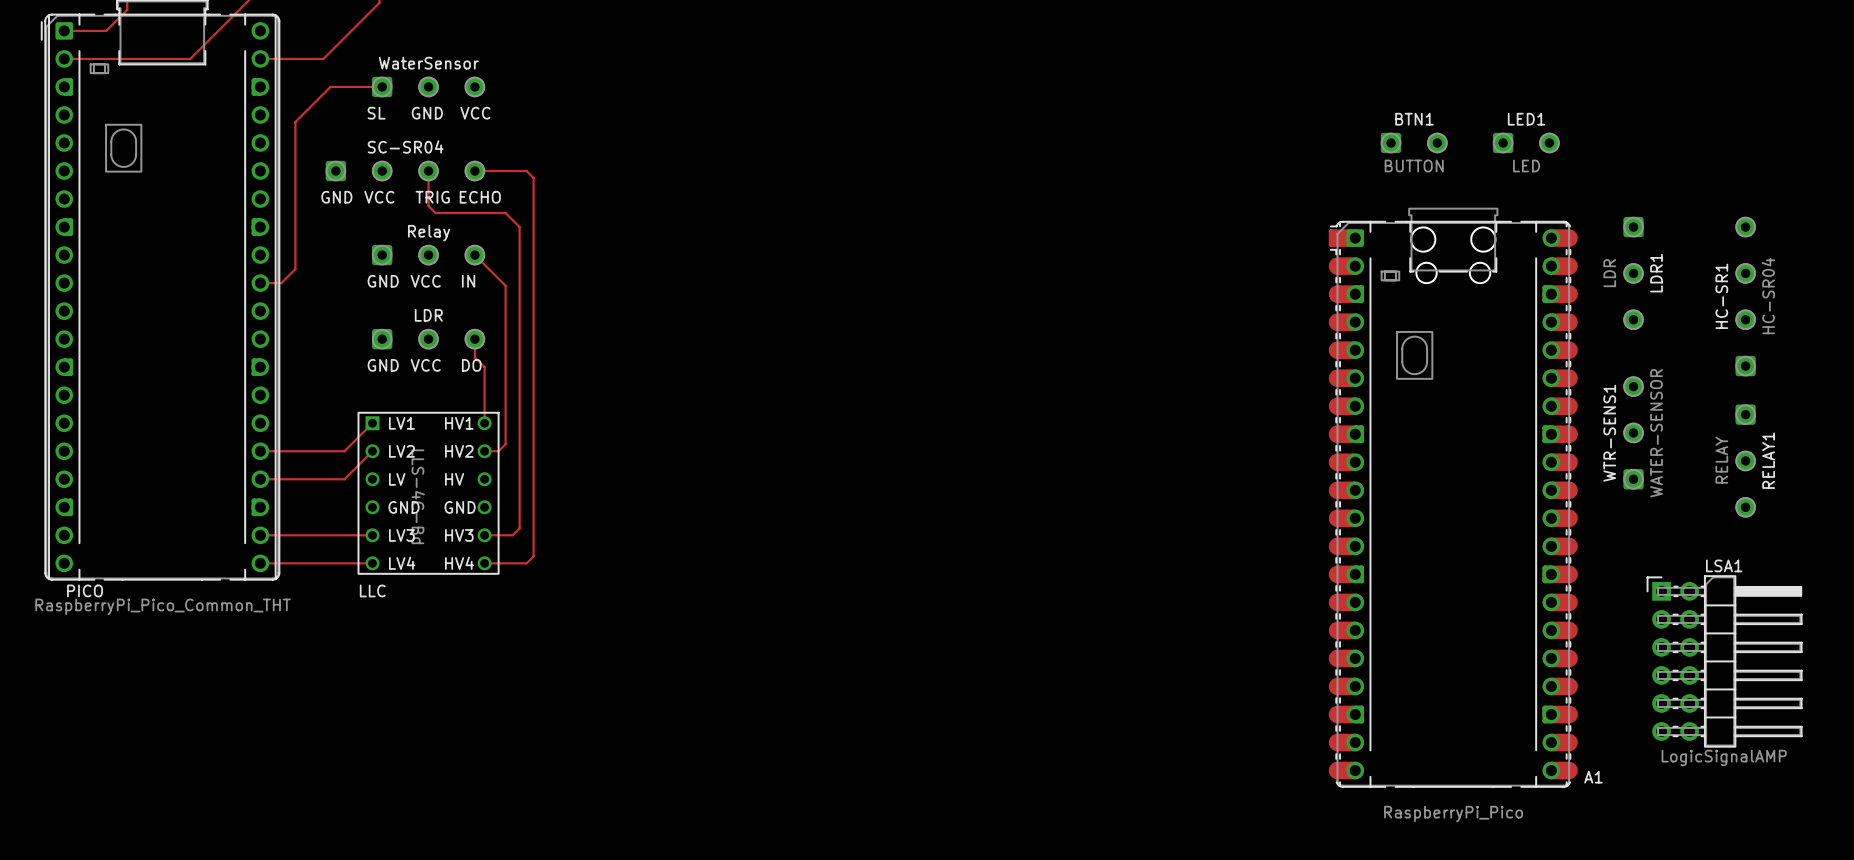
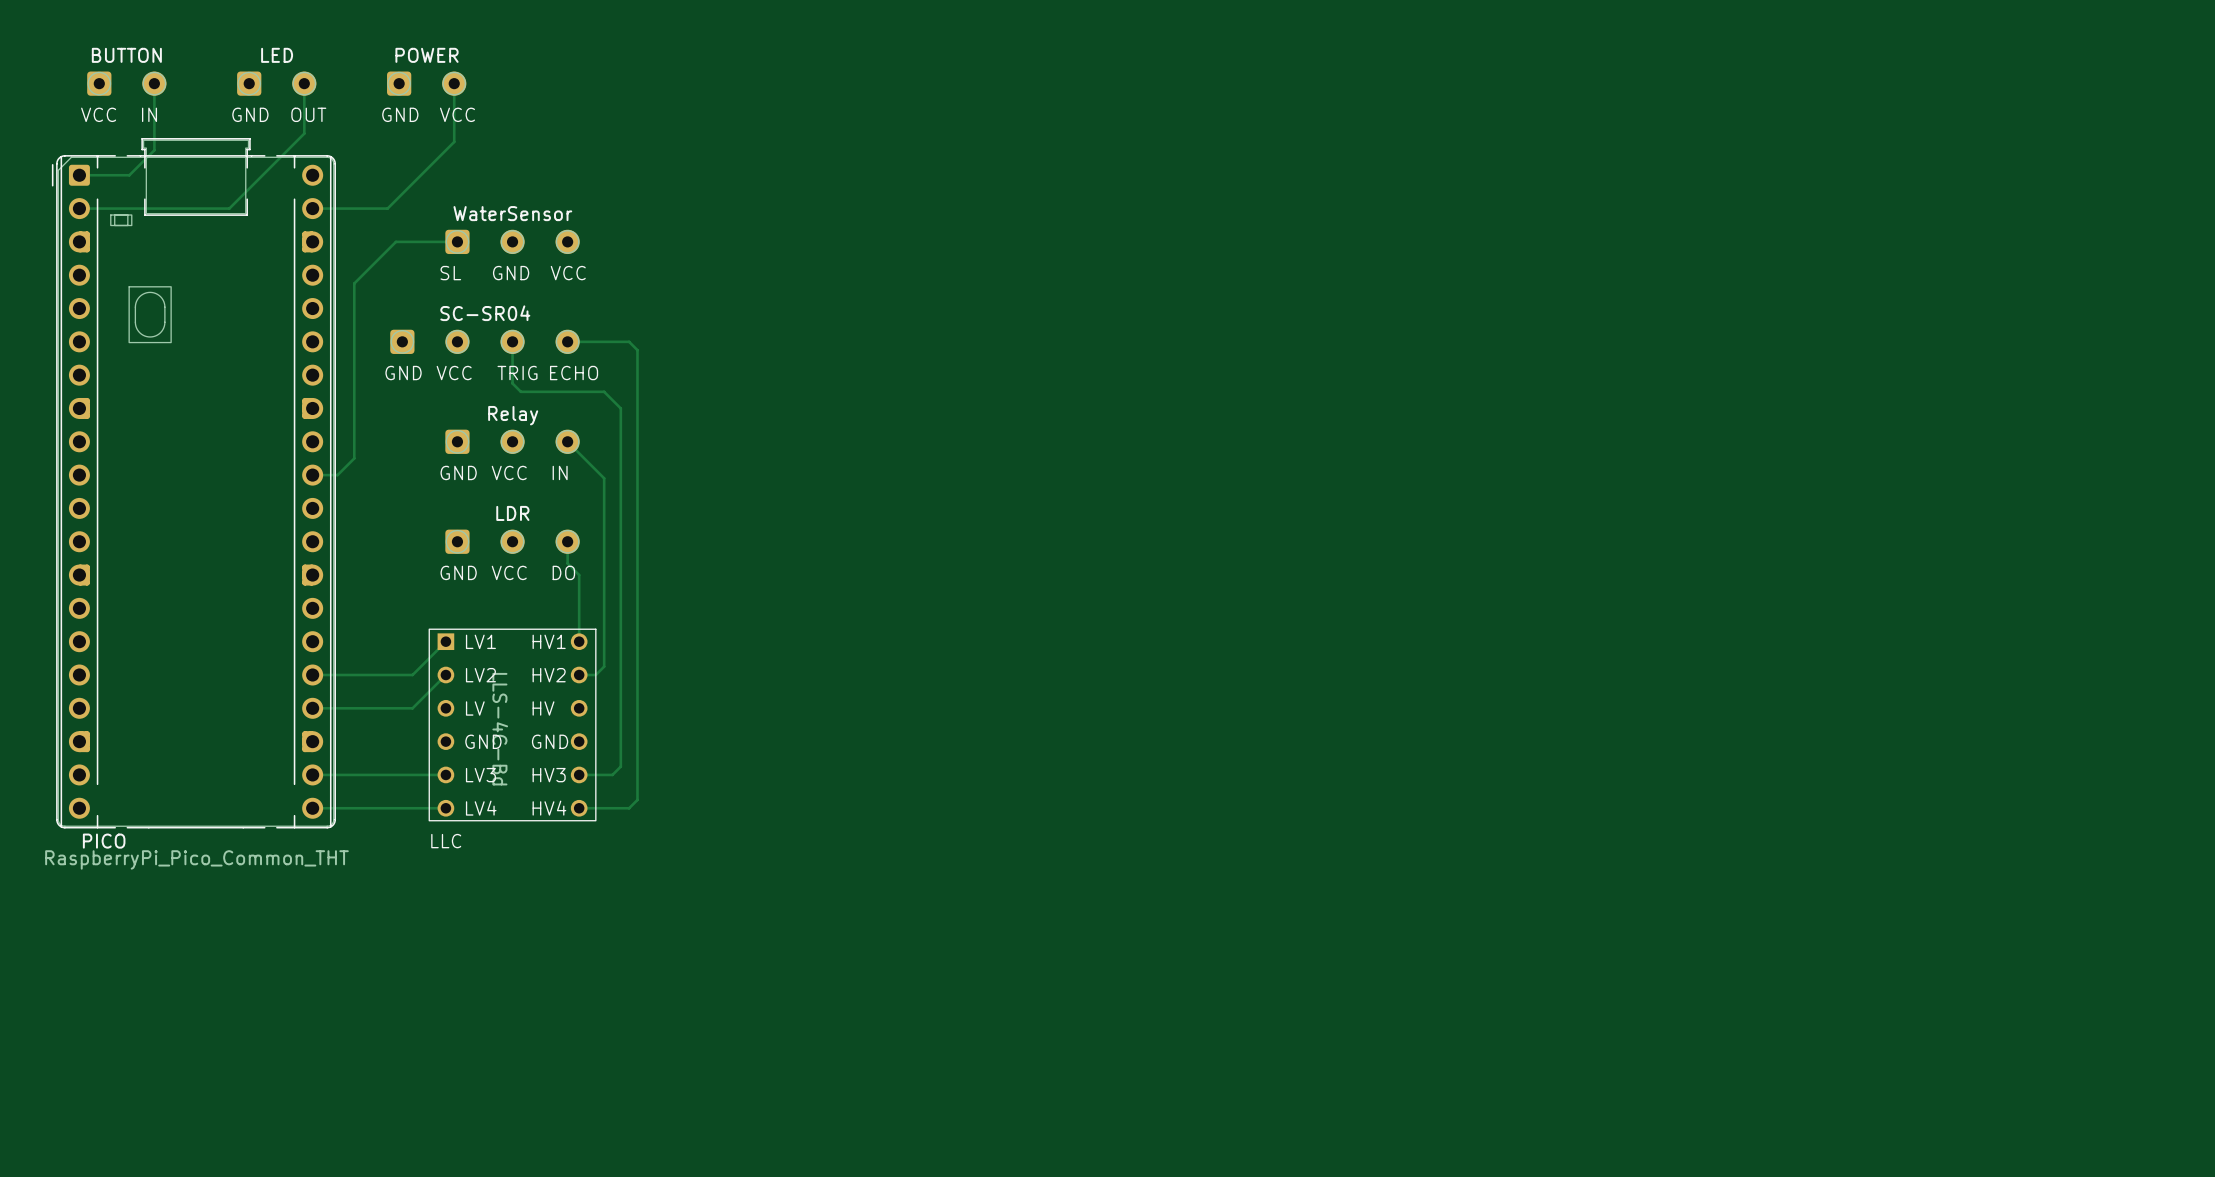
BTN1: BUTTON (1414, 143) -> none
LED1: LED (1526, 143) -> none
LDR1: LDR (1633, 273) -> none
HC-SR1: HC-SR04 (1745, 296) -> none
WTR-SENS1: WATER-SENSOR (1633, 432) -> none
RELAY1: RELAY (1745, 460) -> none
A1: RaspberryPi_Pico (1453, 497) -> none
LSA1: LogicSignalAMP (1724, 661) -> none

